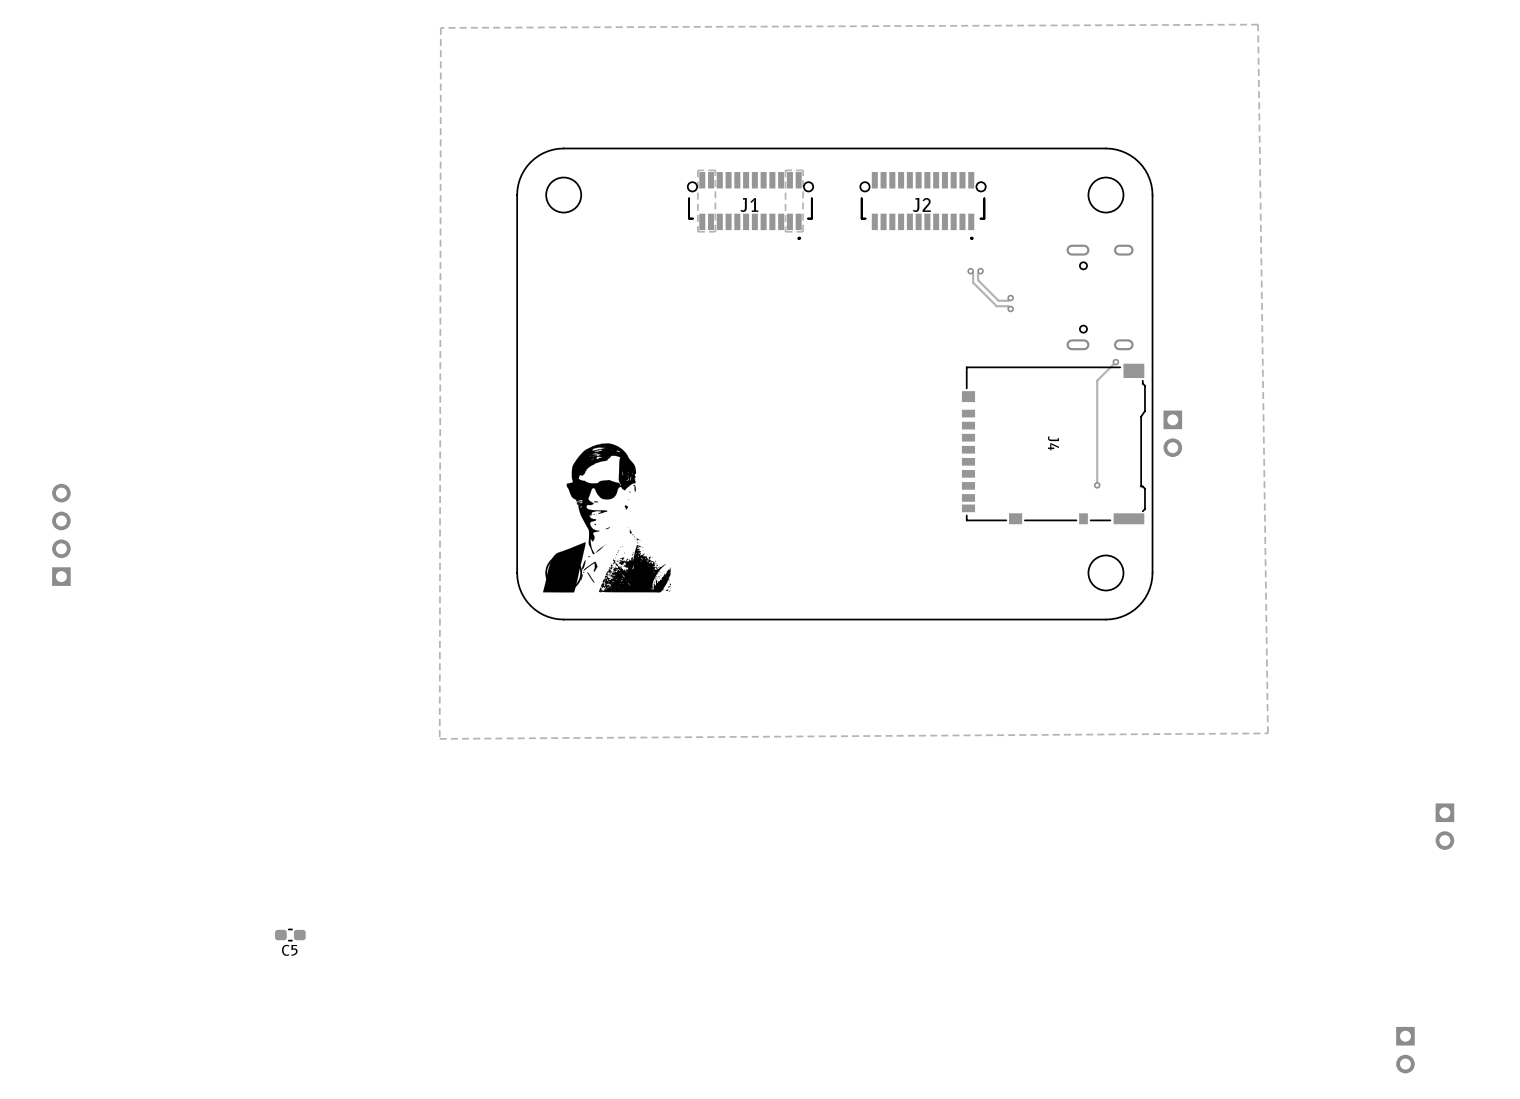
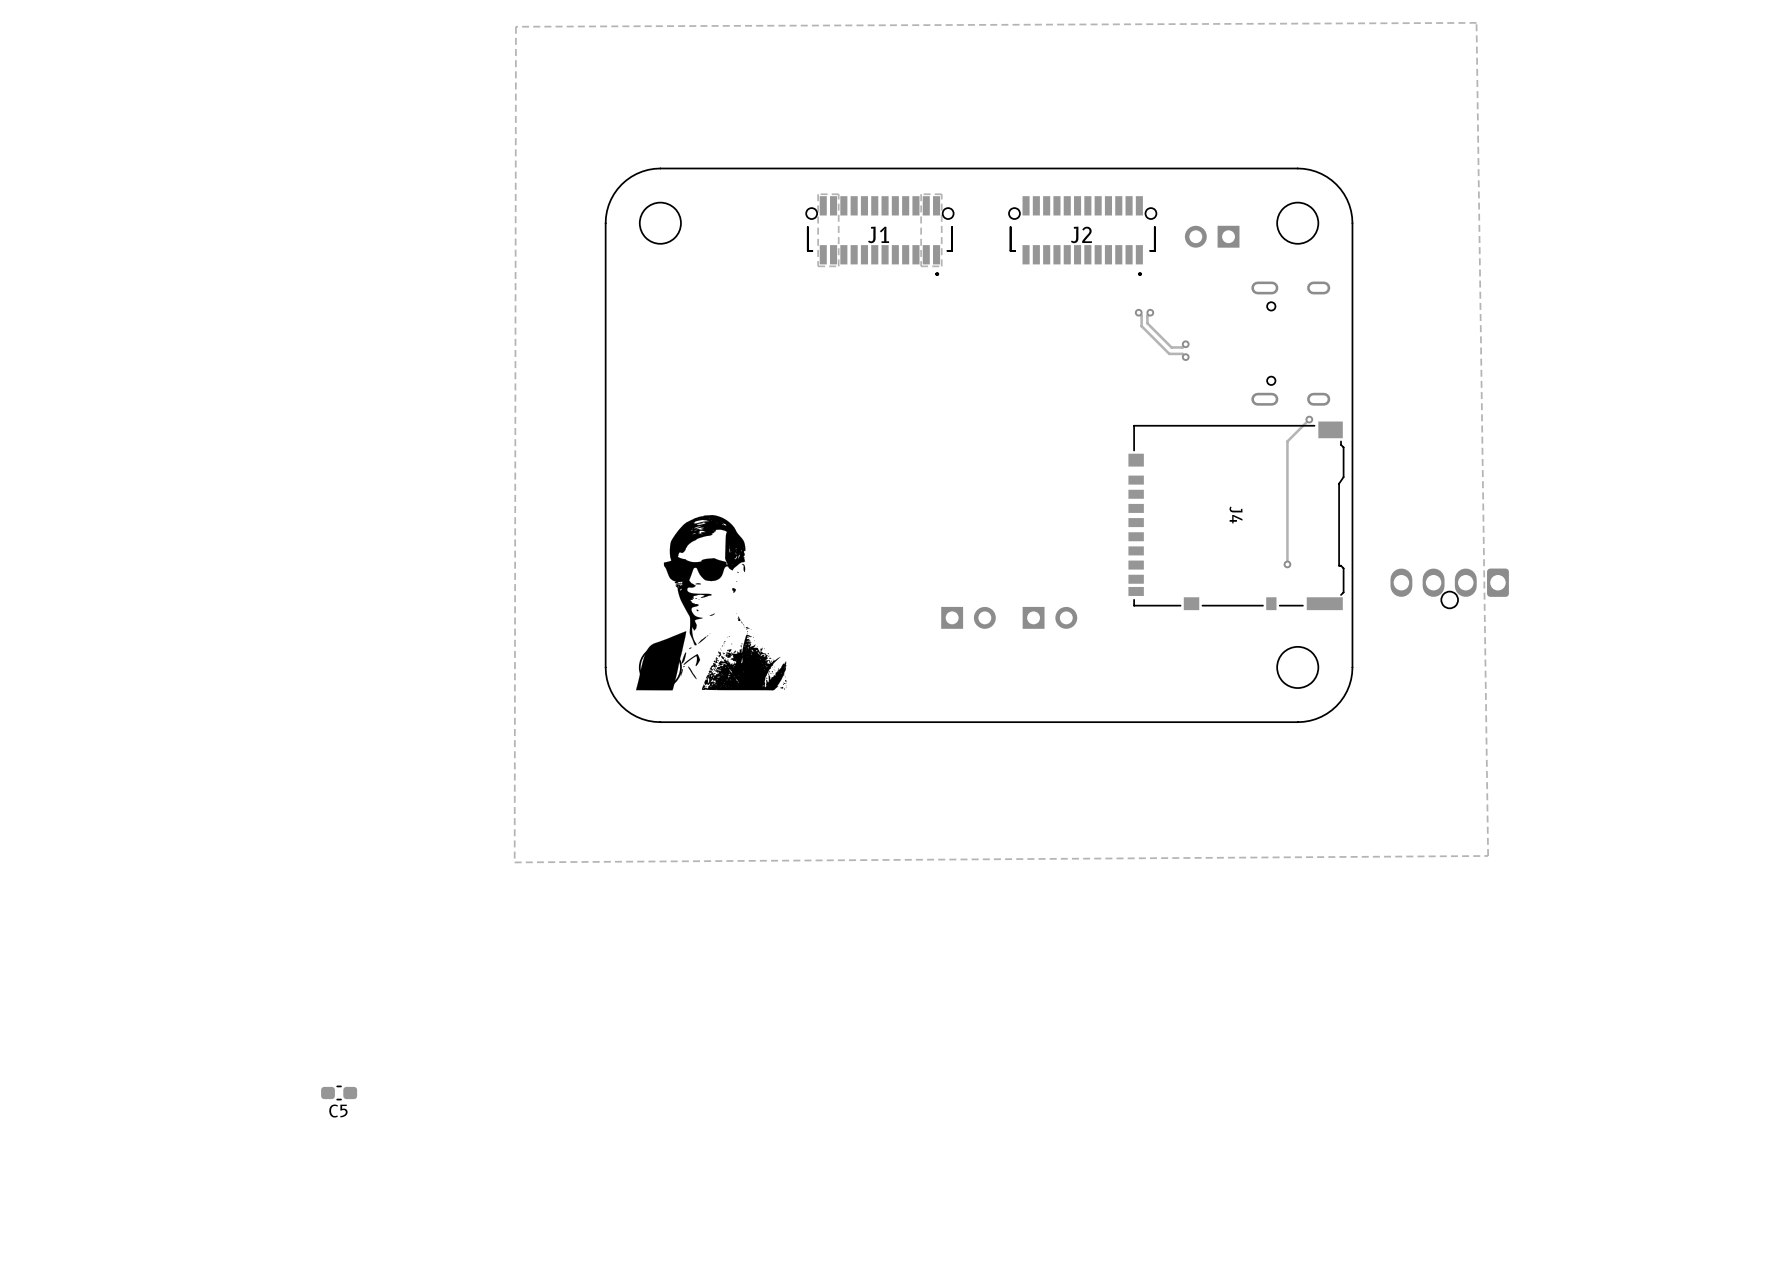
part: none -> (1212, 236)
part: (1172, 433) -> none
part: none -> (1449, 588)
part: none -> (968, 617)
part: none -> (1049, 617)
part: (61, 534) -> none
part: (1444, 826) -> none
part: (1405, 1050) -> none

